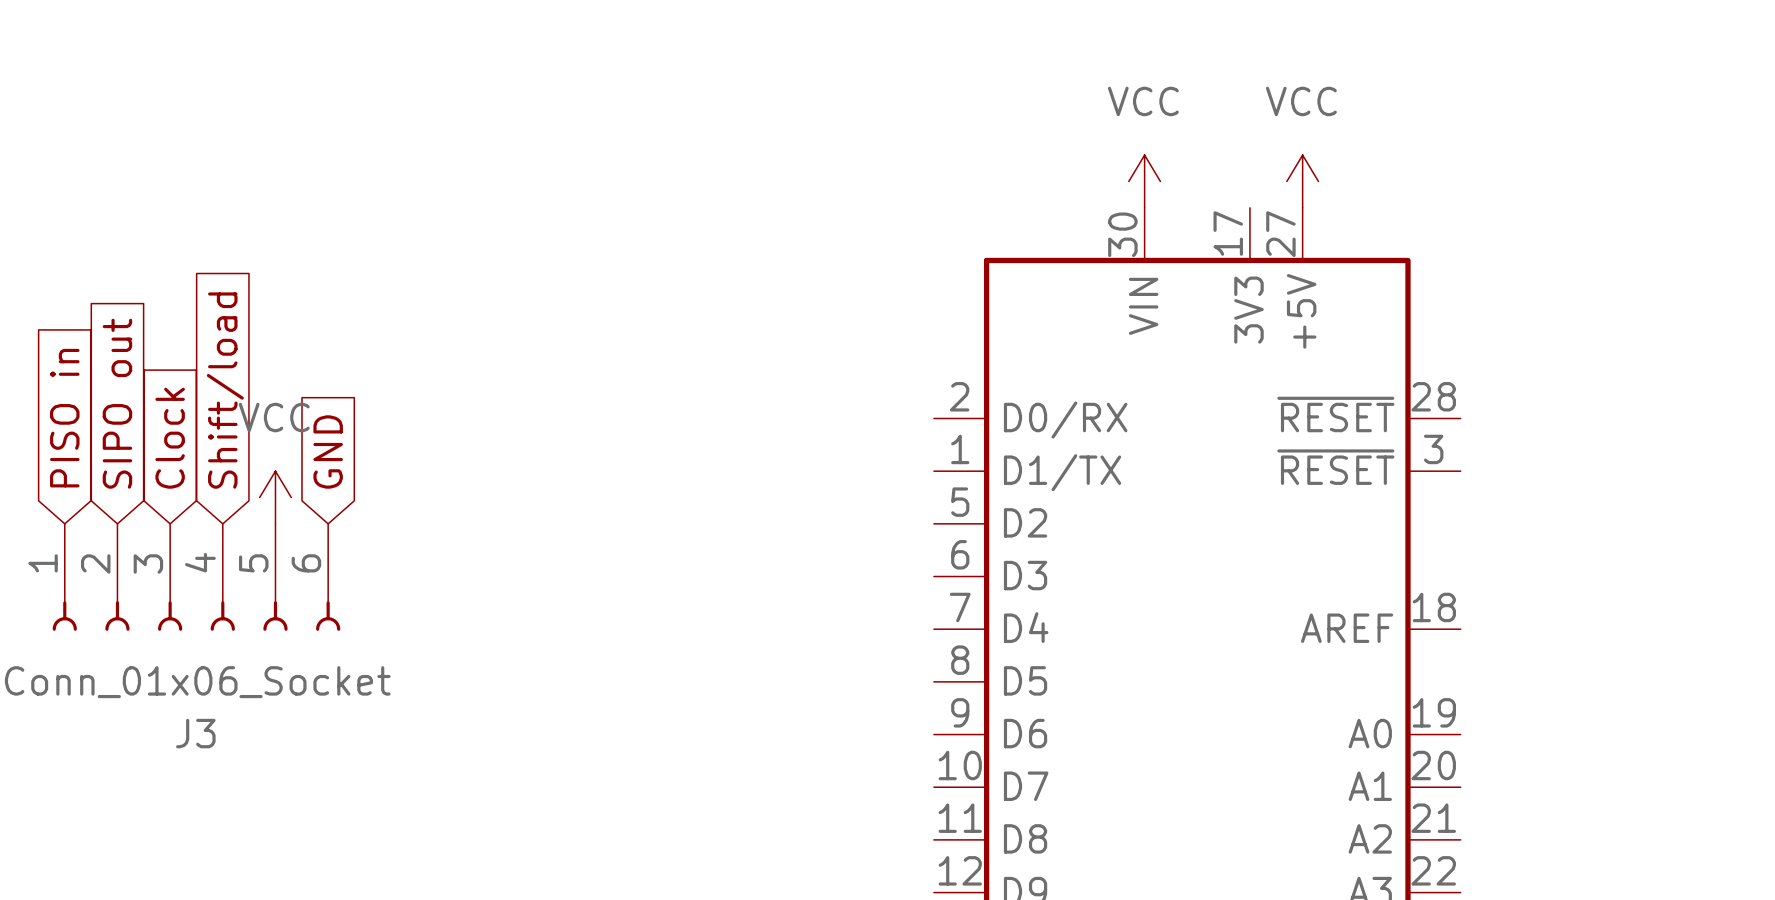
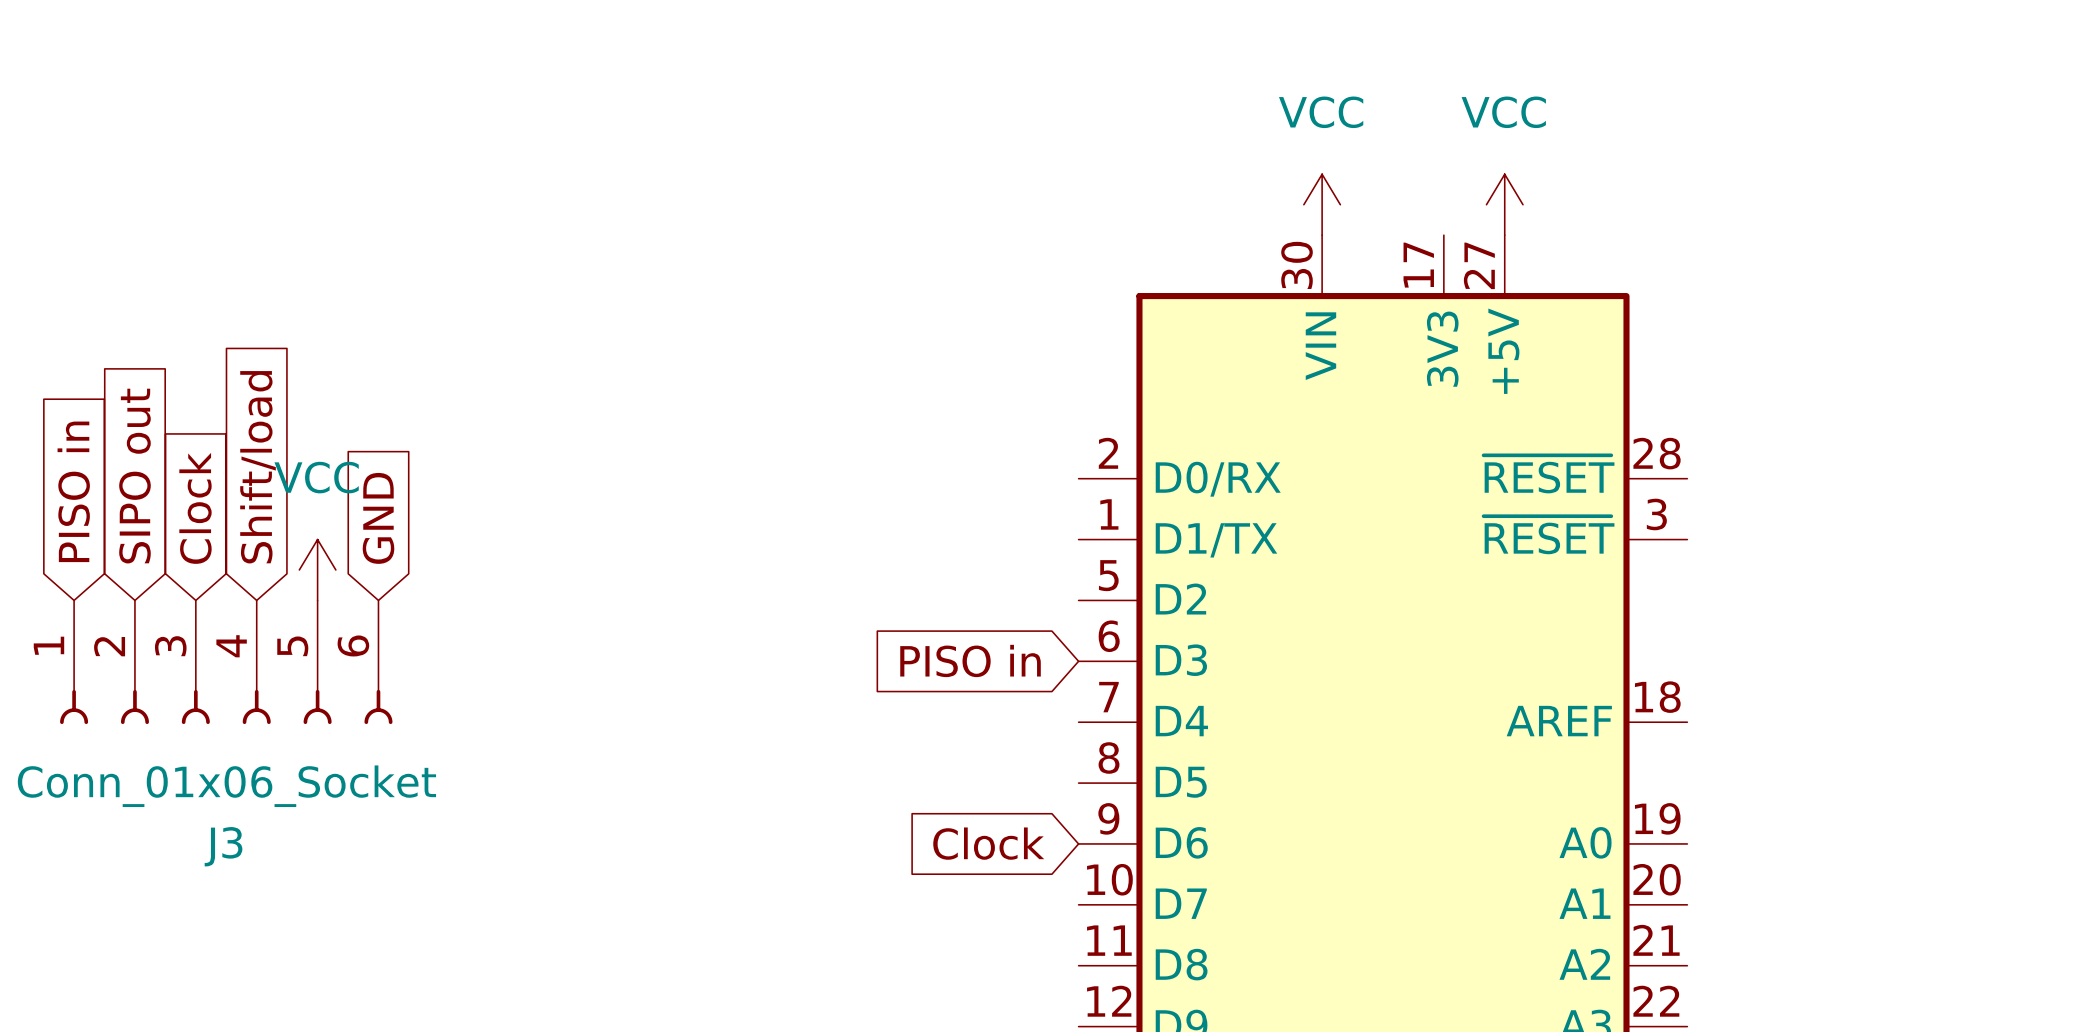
global label: none -> PISO in (970, 660)
global label: none -> Clock (988, 843)

